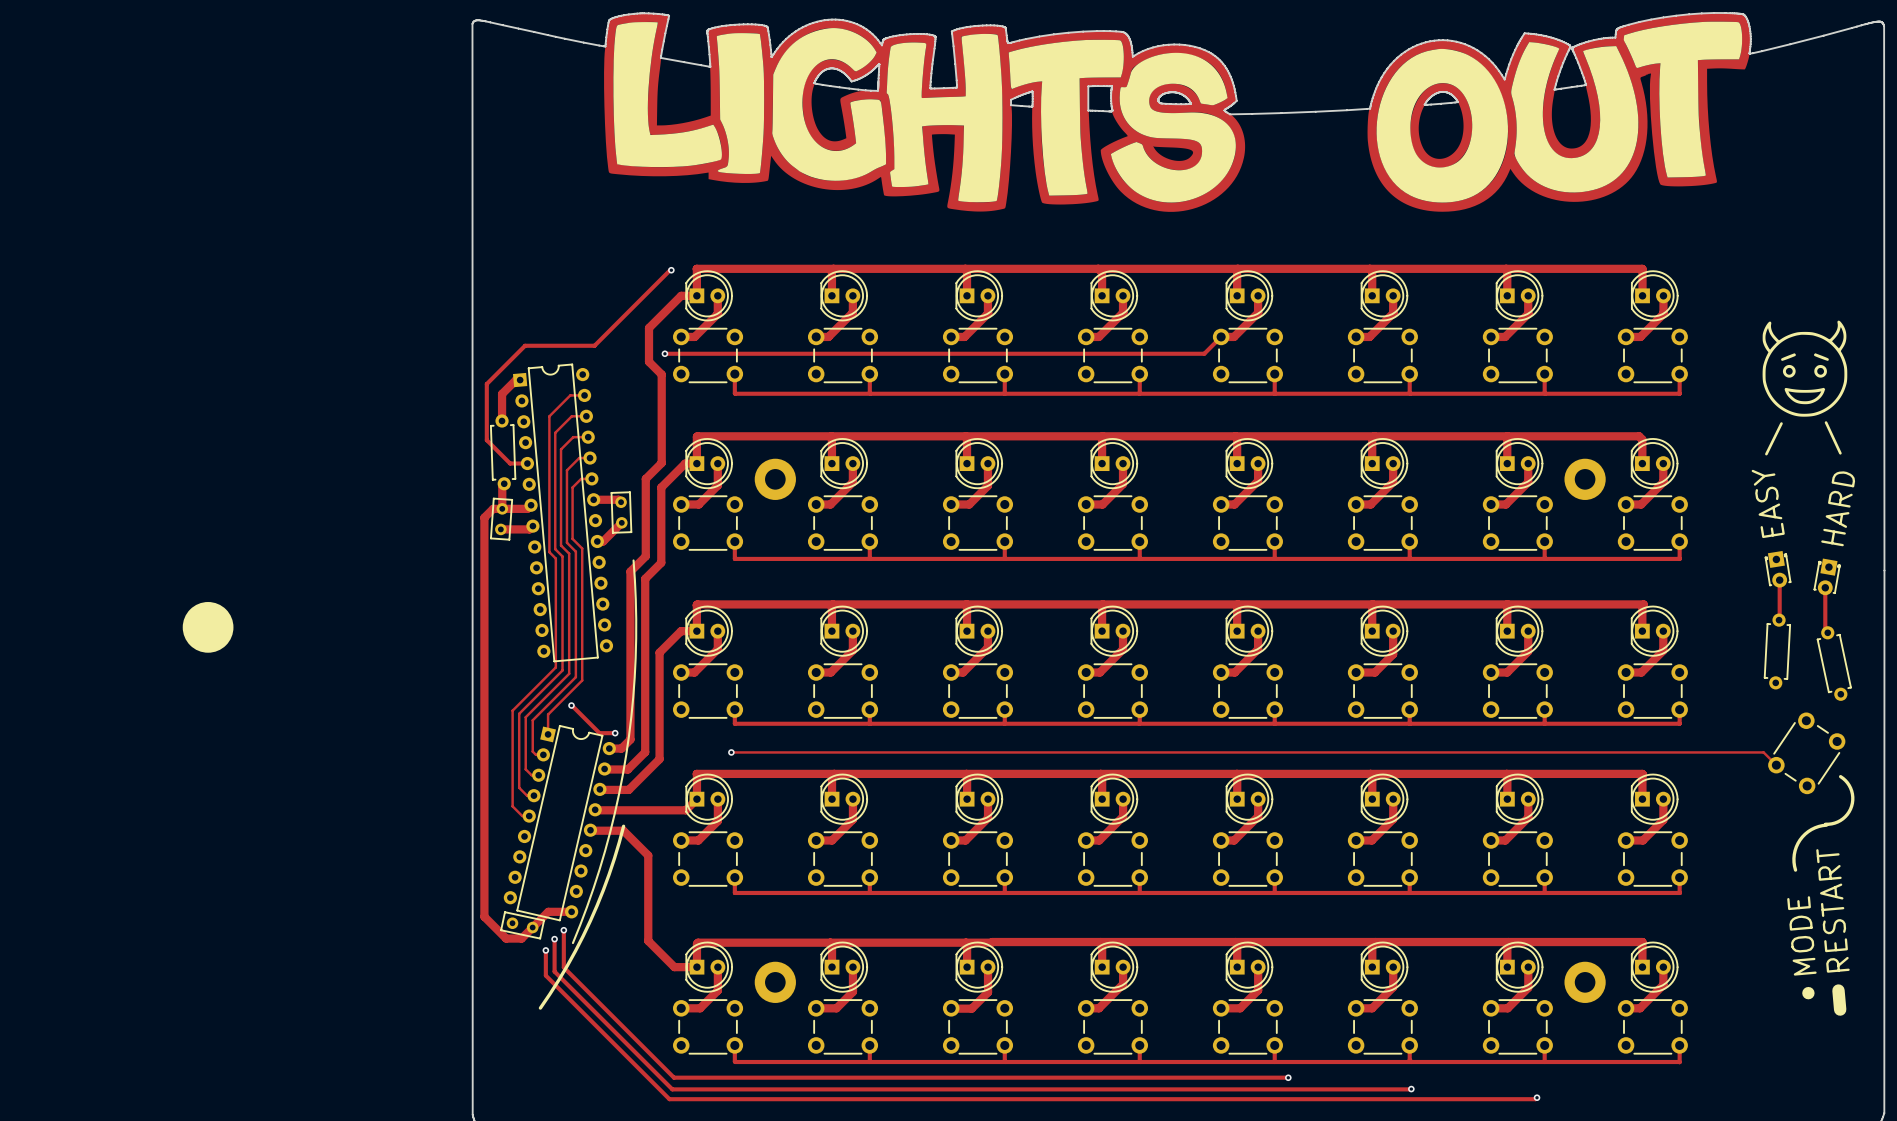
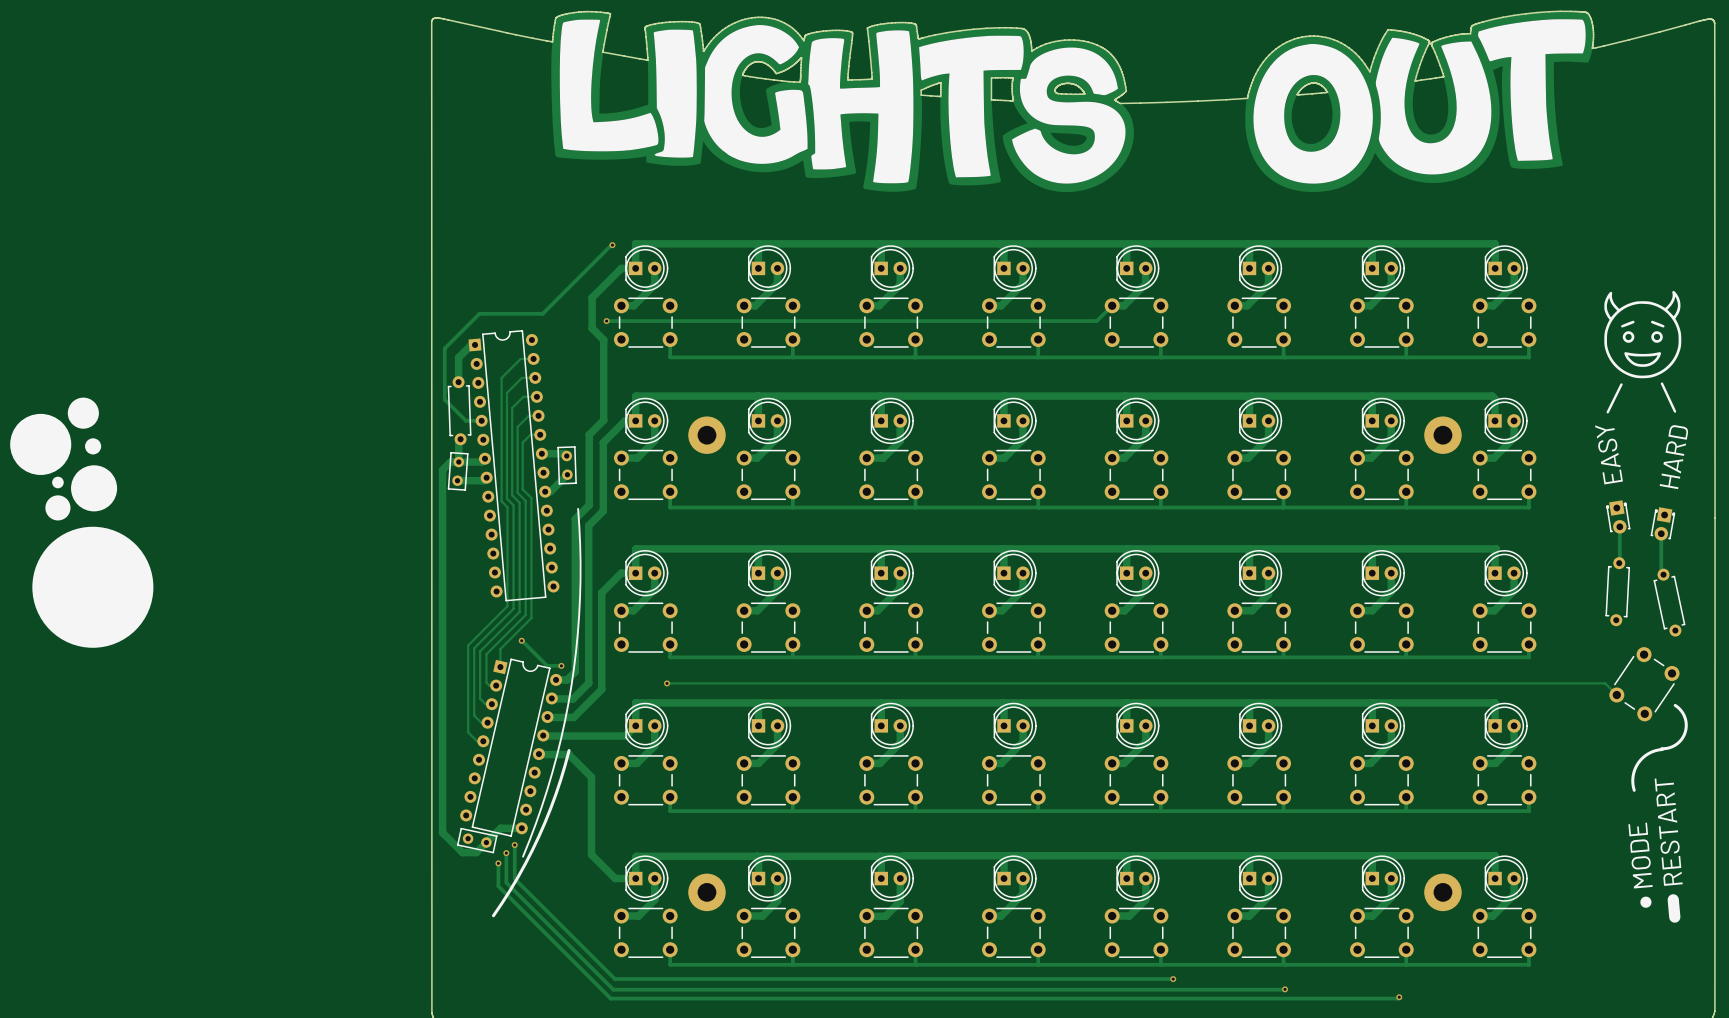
drawing: none -> [10, 397, 154, 648]
drawing: none -> [85, 438, 102, 455]
drawing: [182, 602, 234, 653] -> none

